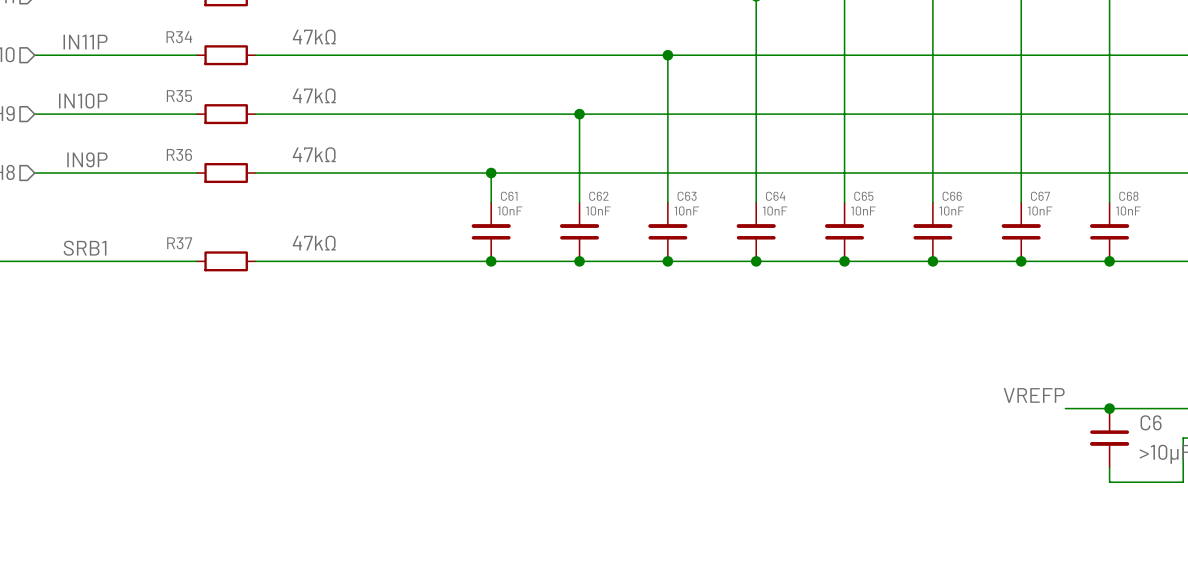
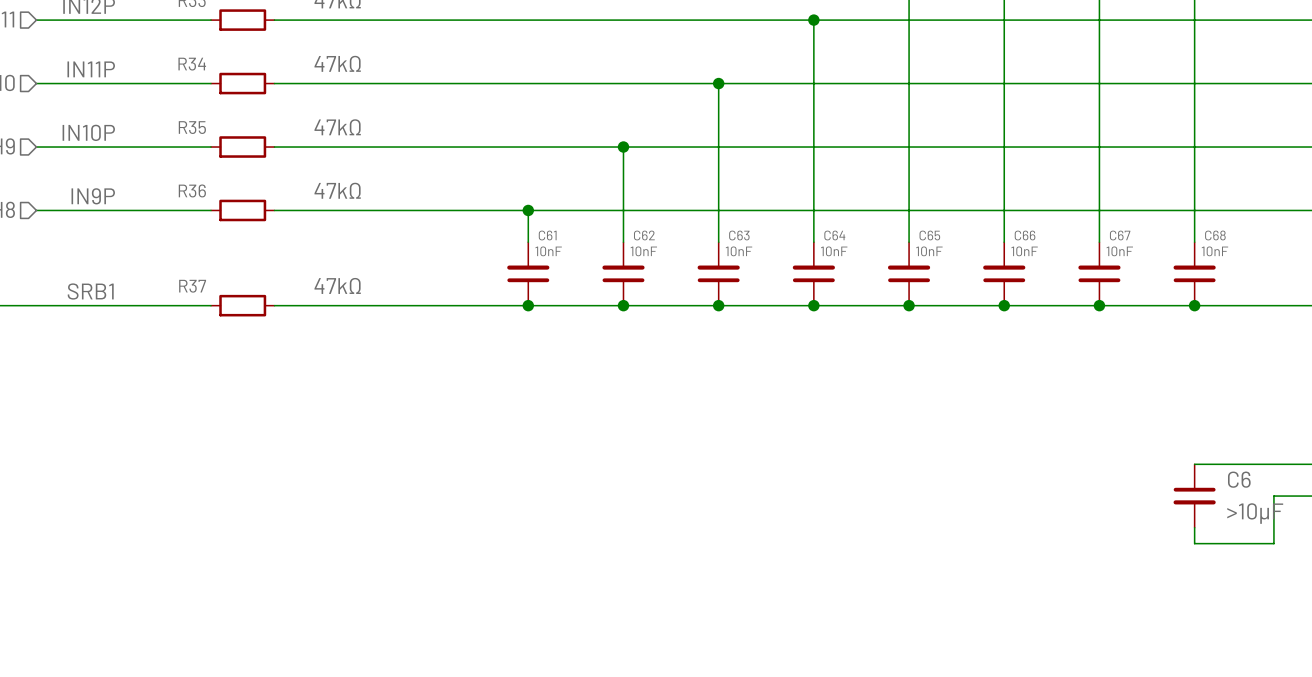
label: VREFP (1034, 395) -> none
wire: (1065, 408) (1109, 408) -> none
junction: (1109, 408) -> none

